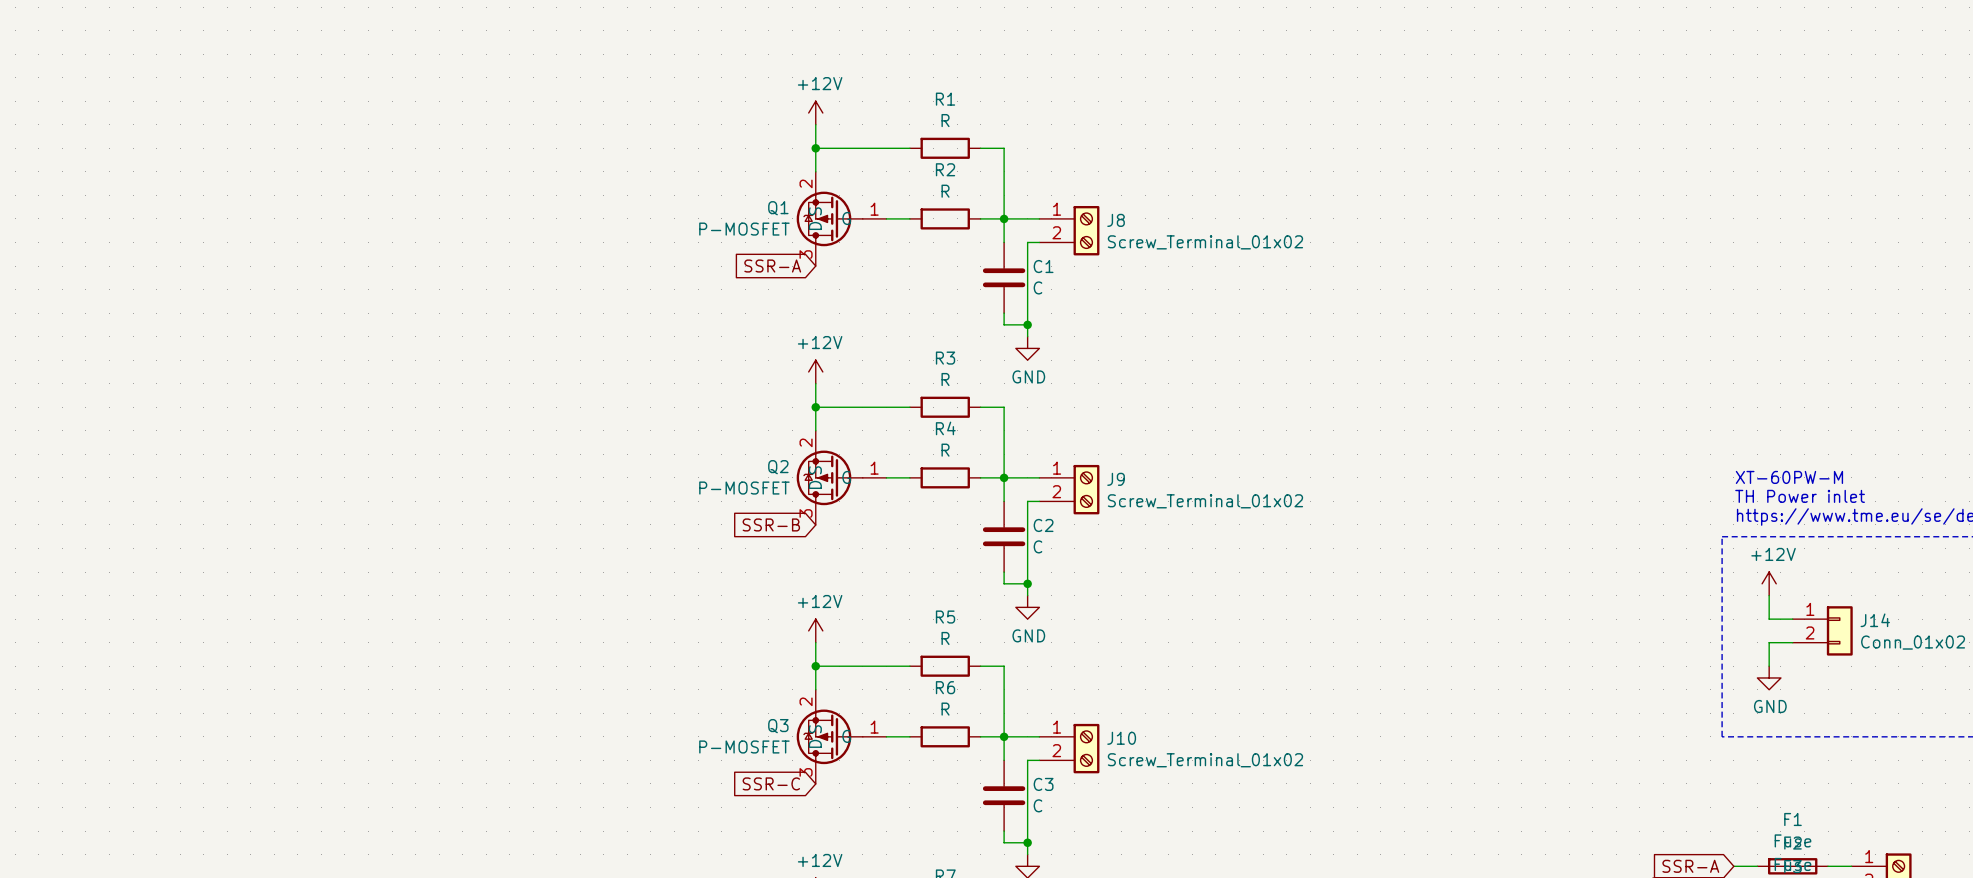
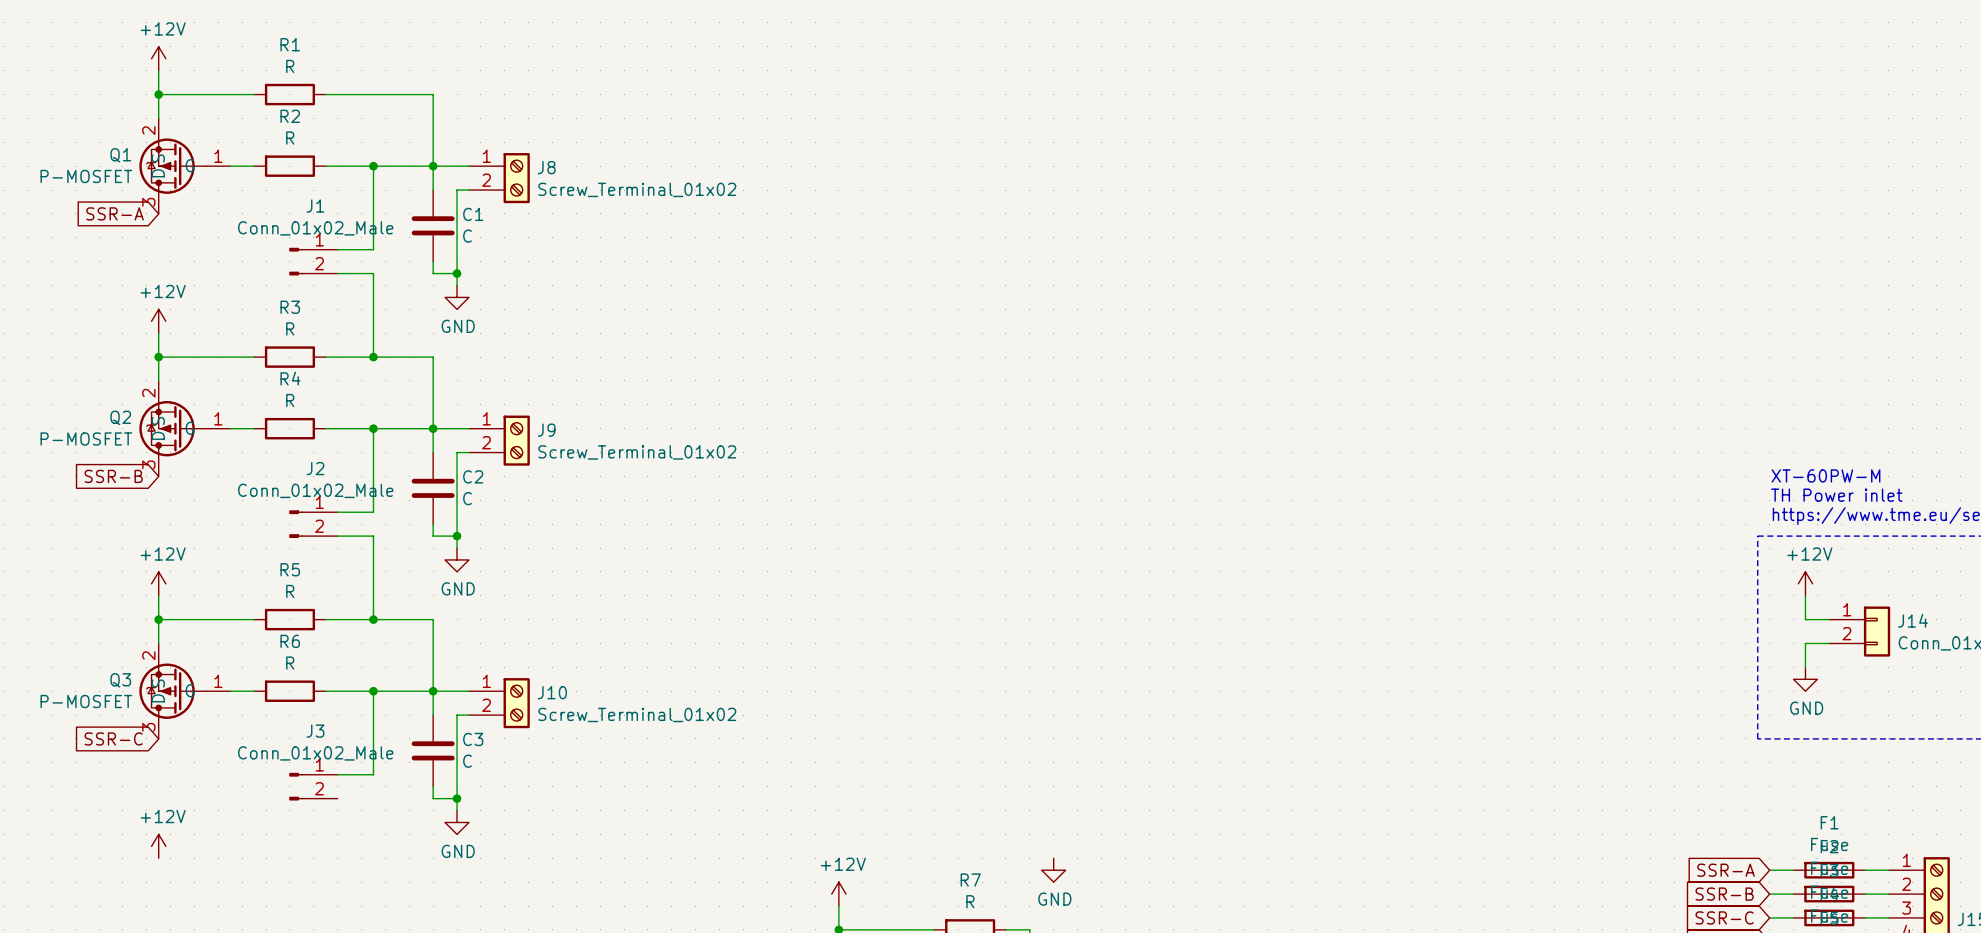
power symbol: none -> +12V (158, 58)
wire: none -> (158, 70) (158, 118)
wire: none -> (158, 94) (254, 94)
junction: none -> (158, 94)
wire: none -> (325, 94) (433, 94) (433, 190)
power symbol: +12V (815, 113) -> none
wire: (815, 124) (815, 171) -> none
wire: (815, 148) (909, 148) -> none
junction: (815, 148) -> none
R1 position: (945, 148) -> (289, 94)
wire: (980, 148) (1004, 148) (1004, 242) -> none
wire: none -> (230, 166) (254, 166)
wire: none -> (325, 166) (468, 166)
wire: none -> (373, 166) (373, 249) (337, 249)
junction: none -> (373, 166)
junction: none -> (433, 166)
wire: none -> (468, 190) (457, 190) (457, 285)
global label: none -> SSR-A (115, 213)
Q1 position: (841, 218) -> (184, 166)
wire: (886, 218) (909, 218) -> none
R2 position: (945, 218) -> (289, 166)
wire: (980, 218) (1039, 218) -> none
junction: (1004, 218) -> none
J8 position: (1069, 230) -> (499, 178)
wire: (1039, 242) (1027, 242) (1027, 336) -> none
J1: none -> Conn_01x02_Male (313, 261)
wire: none -> (433, 261) (433, 273) (457, 273)
global label: SSR-A (772, 266) -> none
wire: none -> (337, 273) (373, 273) (373, 357)
junction: none -> (457, 273)
C1 position: (1004, 277) -> (433, 225)
power symbol: none -> GND (457, 297)
wire: (1004, 313) (1004, 324) (1027, 324) -> none
power symbol: none -> +12V (158, 321)
junction: (1027, 324) -> none
wire: none -> (158, 333) (158, 380)
power symbol: GND (1027, 348) -> none
wire: none -> (158, 357) (254, 357)
junction: none -> (158, 357)
wire: none -> (325, 357) (433, 357) (433, 452)
junction: none -> (373, 357)
power symbol: +12V (815, 371) -> none
wire: (815, 383) (815, 430) -> none
wire: (815, 407) (909, 407) -> none
junction: (815, 407) -> none
R3 position: (945, 407) -> (289, 357)
wire: (980, 407) (1004, 407) (1004, 501) -> none
wire: none -> (230, 428) (254, 428)
wire: none -> (325, 428) (468, 428)
wire: none -> (373, 428) (373, 512) (337, 512)
junction: none -> (373, 428)
junction: none -> (433, 428)
wire: none -> (468, 452) (457, 452) (457, 548)
global label: none -> SSR-B (113, 476)
Q2 position: (841, 477) -> (184, 428)
wire: (886, 477) (909, 477) -> none
R4 position: (945, 477) -> (289, 428)
wire: (980, 477) (1039, 477) -> none
junction: (1004, 477) -> none
J9 position: (1069, 489) -> (499, 440)
wire: (1039, 501) (1027, 501) (1027, 595) -> none
J2: none -> Conn_01x02_Male (313, 524)
wire: none -> (433, 524) (433, 536) (457, 536)
global label: SSR-B (771, 524) -> none
wire: none -> (337, 536) (373, 536) (373, 619)
junction: none -> (457, 536)
C2 position: (1004, 536) -> (433, 488)
power symbol: none -> GND (457, 559)
wire: (1004, 572) (1004, 583) (1027, 583) -> none
power symbol: none -> +12V (158, 583)
junction: (1027, 583) -> none
wire: none -> (158, 595) (158, 643)
power symbol: GND (1027, 607) -> none
wire: none -> (158, 619) (254, 619)
junction: none -> (158, 619)
wire: none -> (325, 619) (433, 619) (433, 715)
junction: none -> (373, 619)
power symbol: +12V (815, 630) -> none
wire: (815, 642) (815, 689) -> none
wire: (815, 666) (909, 666) -> none
junction: (815, 666) -> none
R5 position: (945, 666) -> (289, 619)
wire: (980, 666) (1004, 666) (1004, 760) -> none
wire: none -> (230, 691) (254, 691)
wire: none -> (325, 691) (468, 691)
wire: none -> (373, 691) (373, 774) (337, 774)
junction: none -> (373, 691)
junction: none -> (433, 691)
wire: none -> (468, 715) (457, 715) (457, 810)
global label: none -> SSR-C (113, 738)
Q3 position: (841, 736) -> (184, 691)
wire: (886, 736) (909, 736) -> none
R6 position: (945, 736) -> (289, 691)
wire: (980, 736) (1039, 736) -> none
junction: (1004, 736) -> none
J10 position: (1069, 748) -> (499, 703)
wire: (1039, 760) (1027, 760) (1027, 854) -> none
J3: none -> Conn_01x02_Male (313, 786)
wire: none -> (433, 786) (433, 798) (457, 798)
global label: SSR-C (771, 783) -> none
junction: none -> (457, 798)
C3 position: (1004, 795) -> (433, 750)
power symbol: none -> GND (457, 822)
wire: (1004, 831) (1004, 842) (1027, 842) -> none
power symbol: none -> +12V (158, 846)
junction: (1027, 842) -> none

